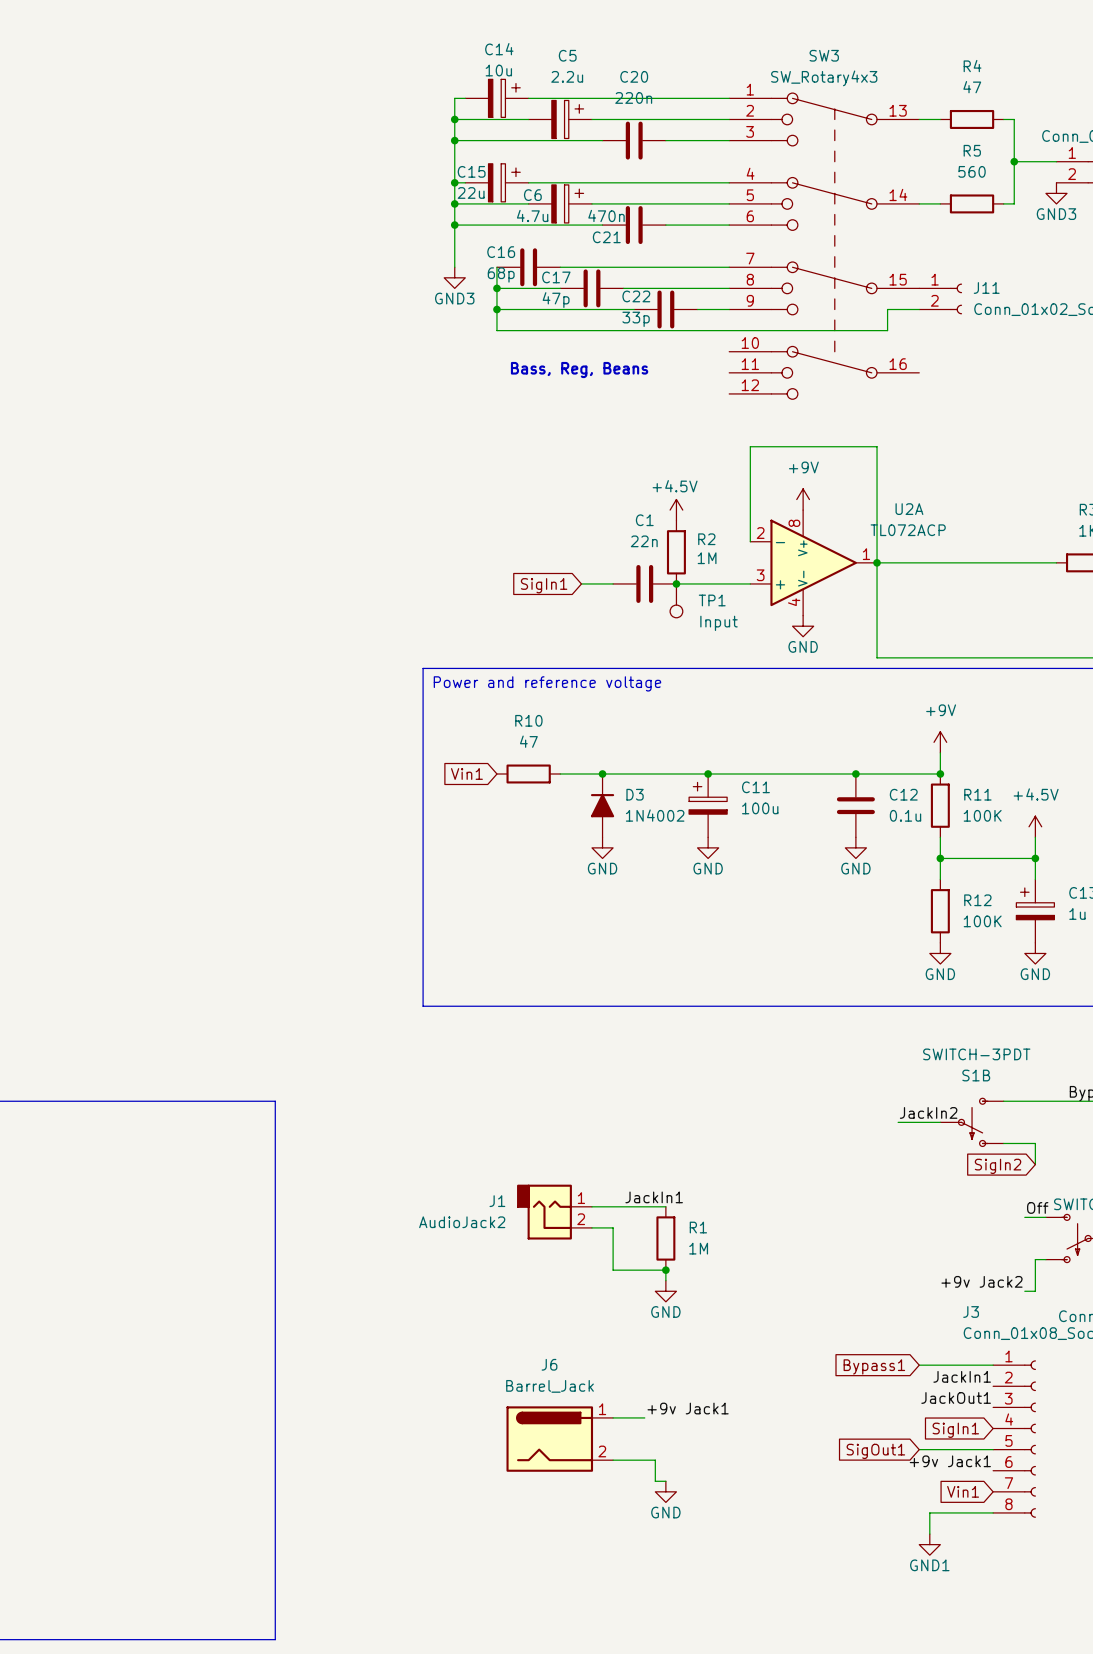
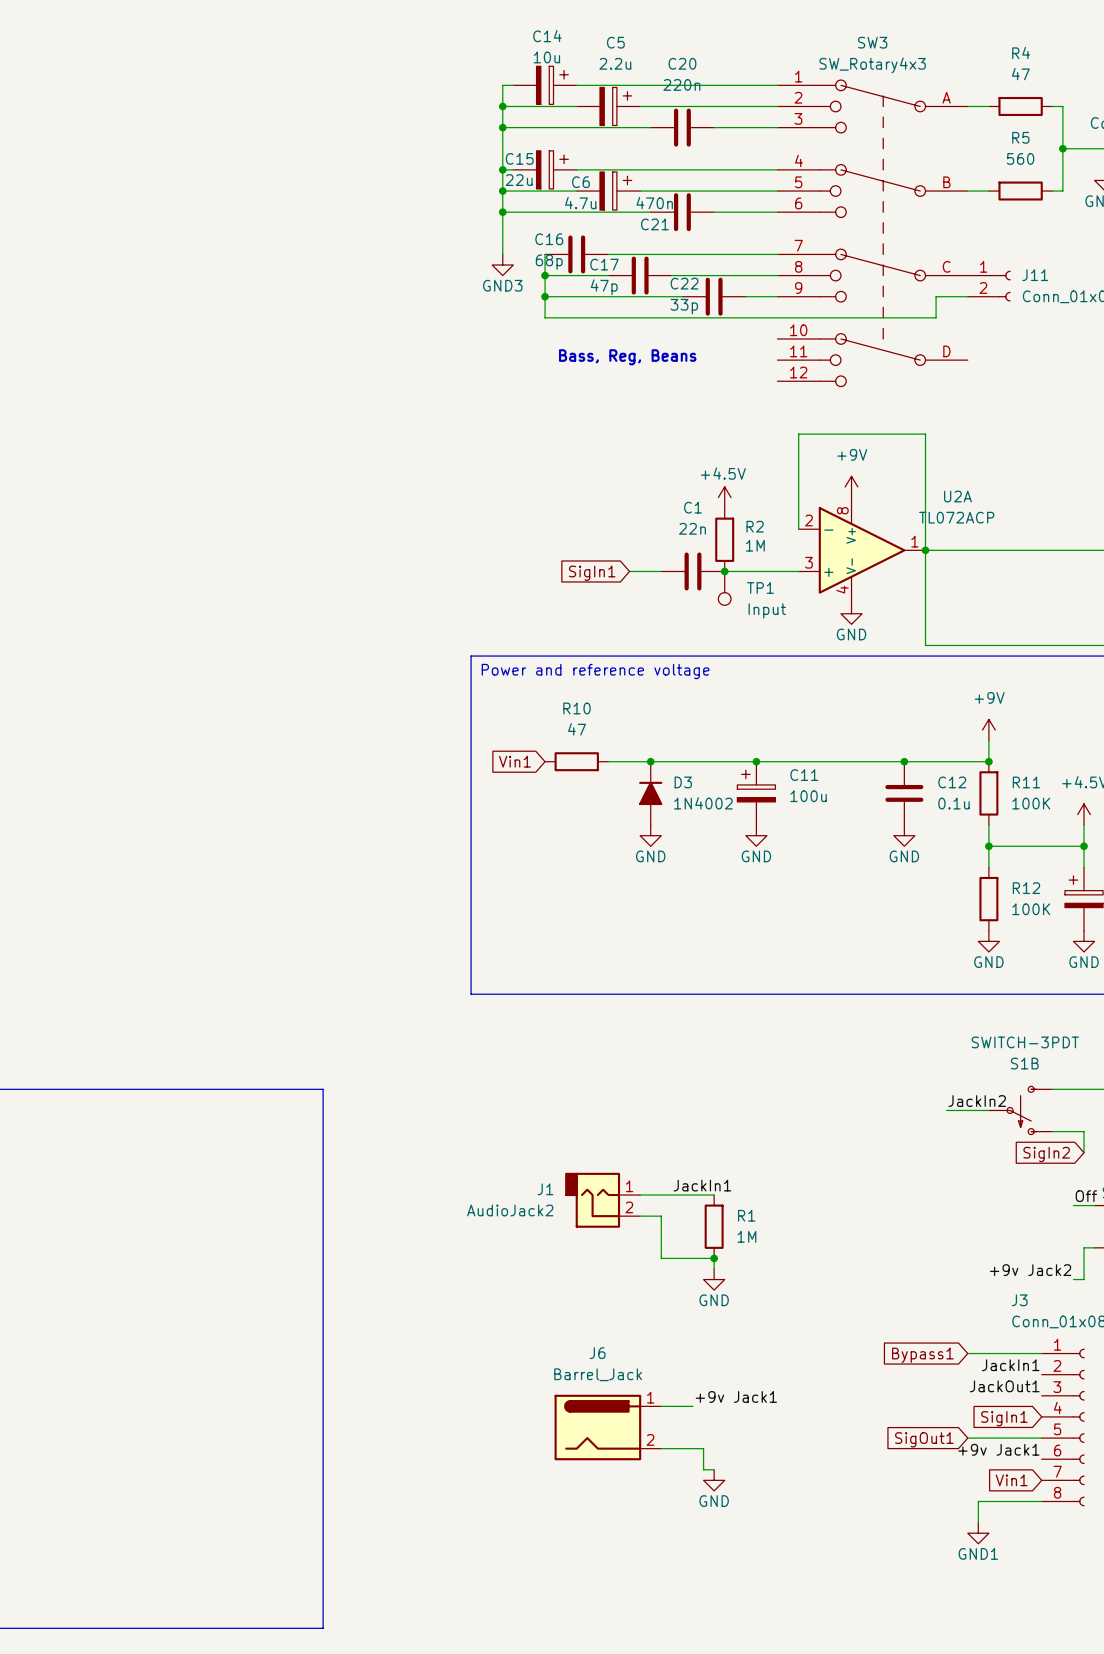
SW3 pin number: 13 (898, 110) -> A (946, 97)
SW3 pin number: 14 (898, 194) -> B (946, 182)
SW3 pin number: 15 (898, 279) -> C (946, 266)
SW3 pin number: 16 (898, 364) -> D (946, 351)

